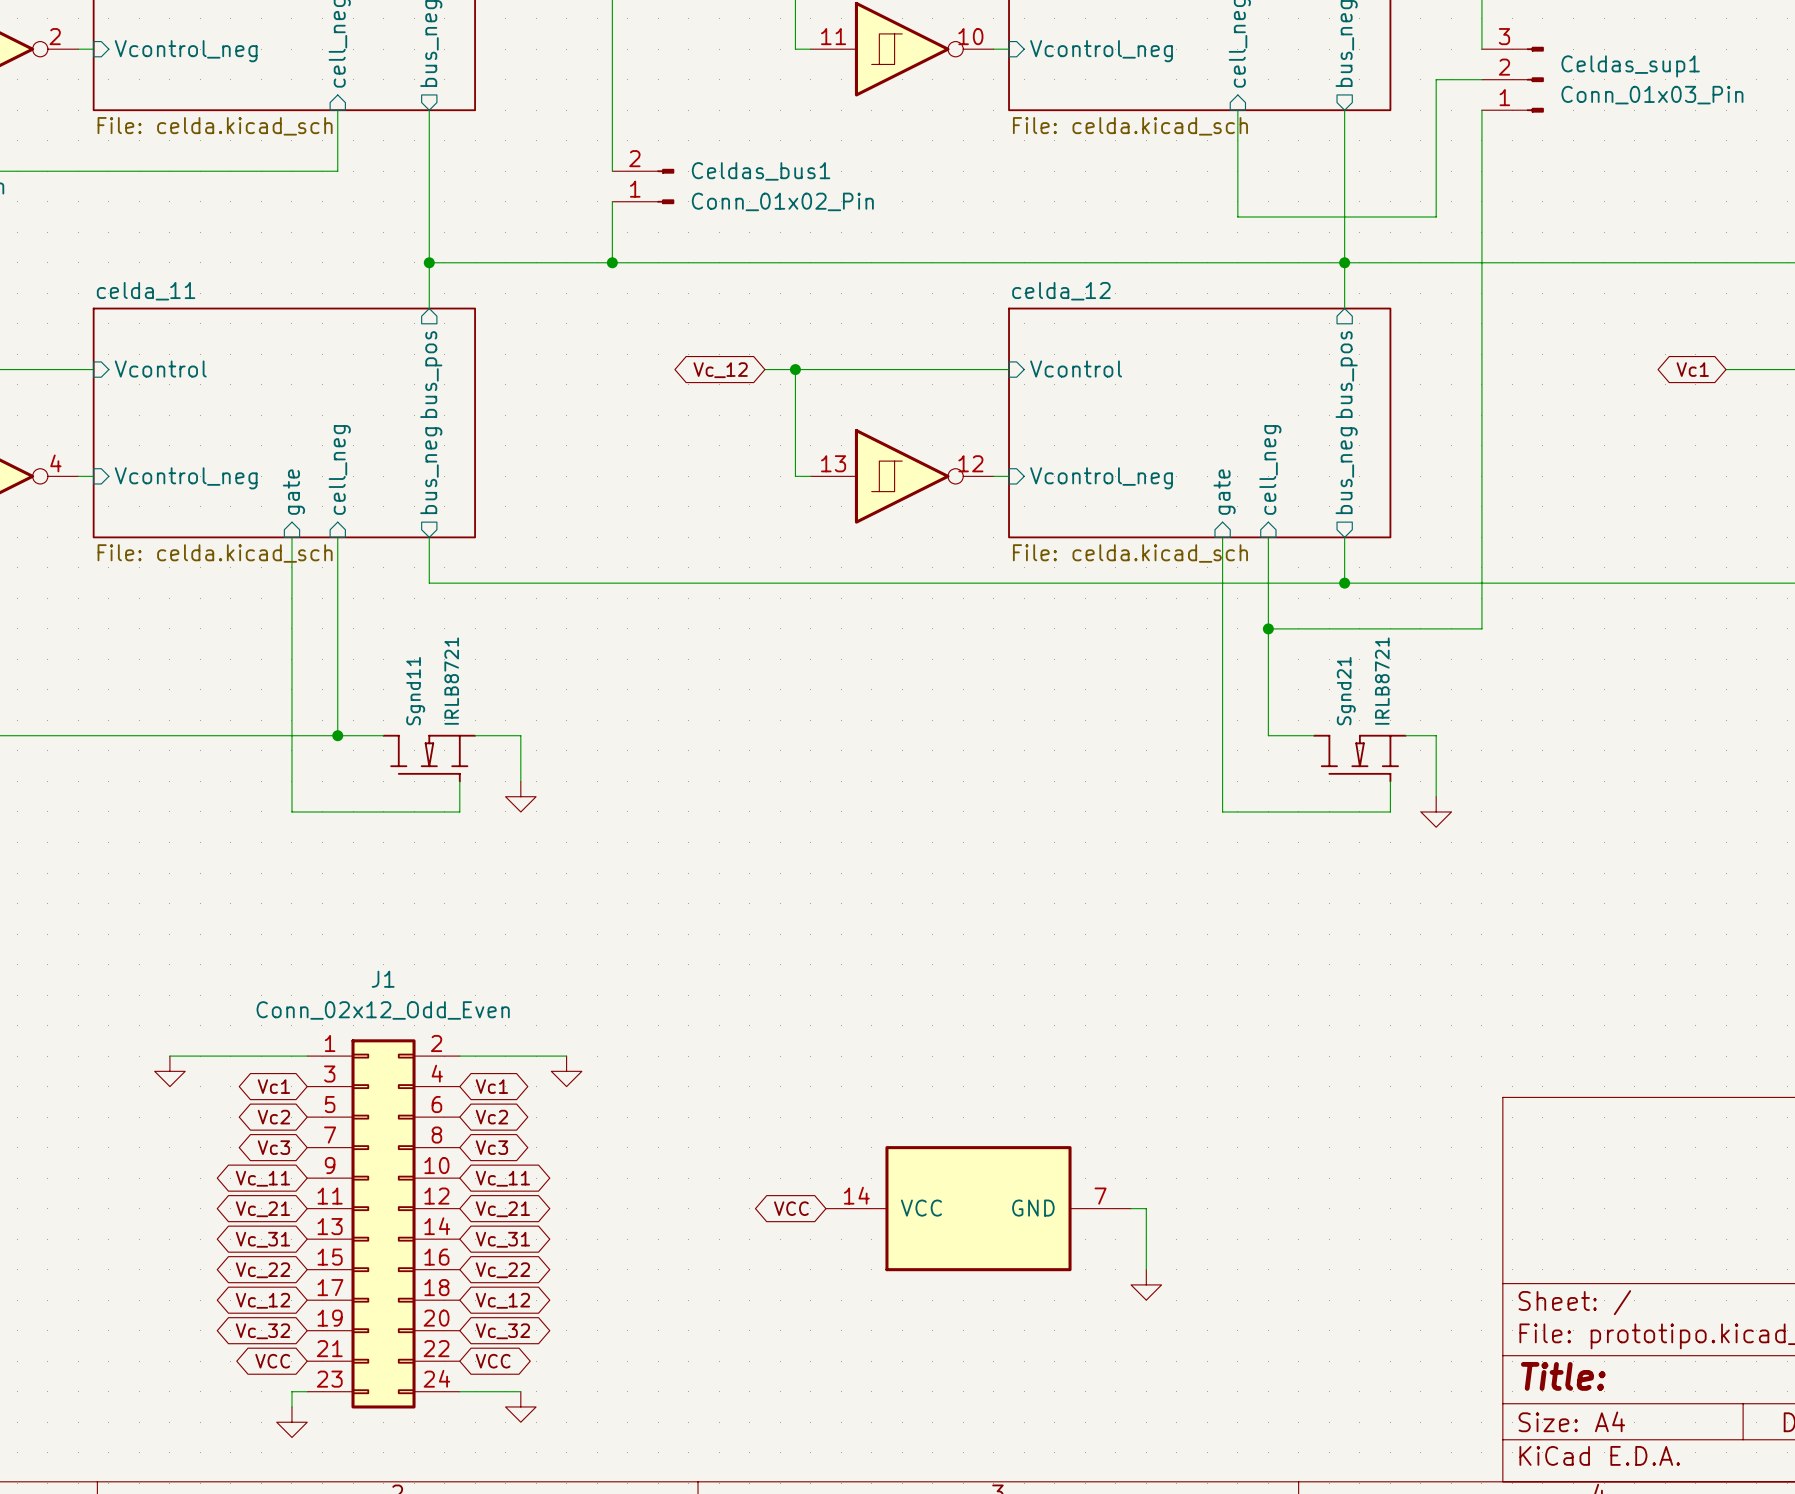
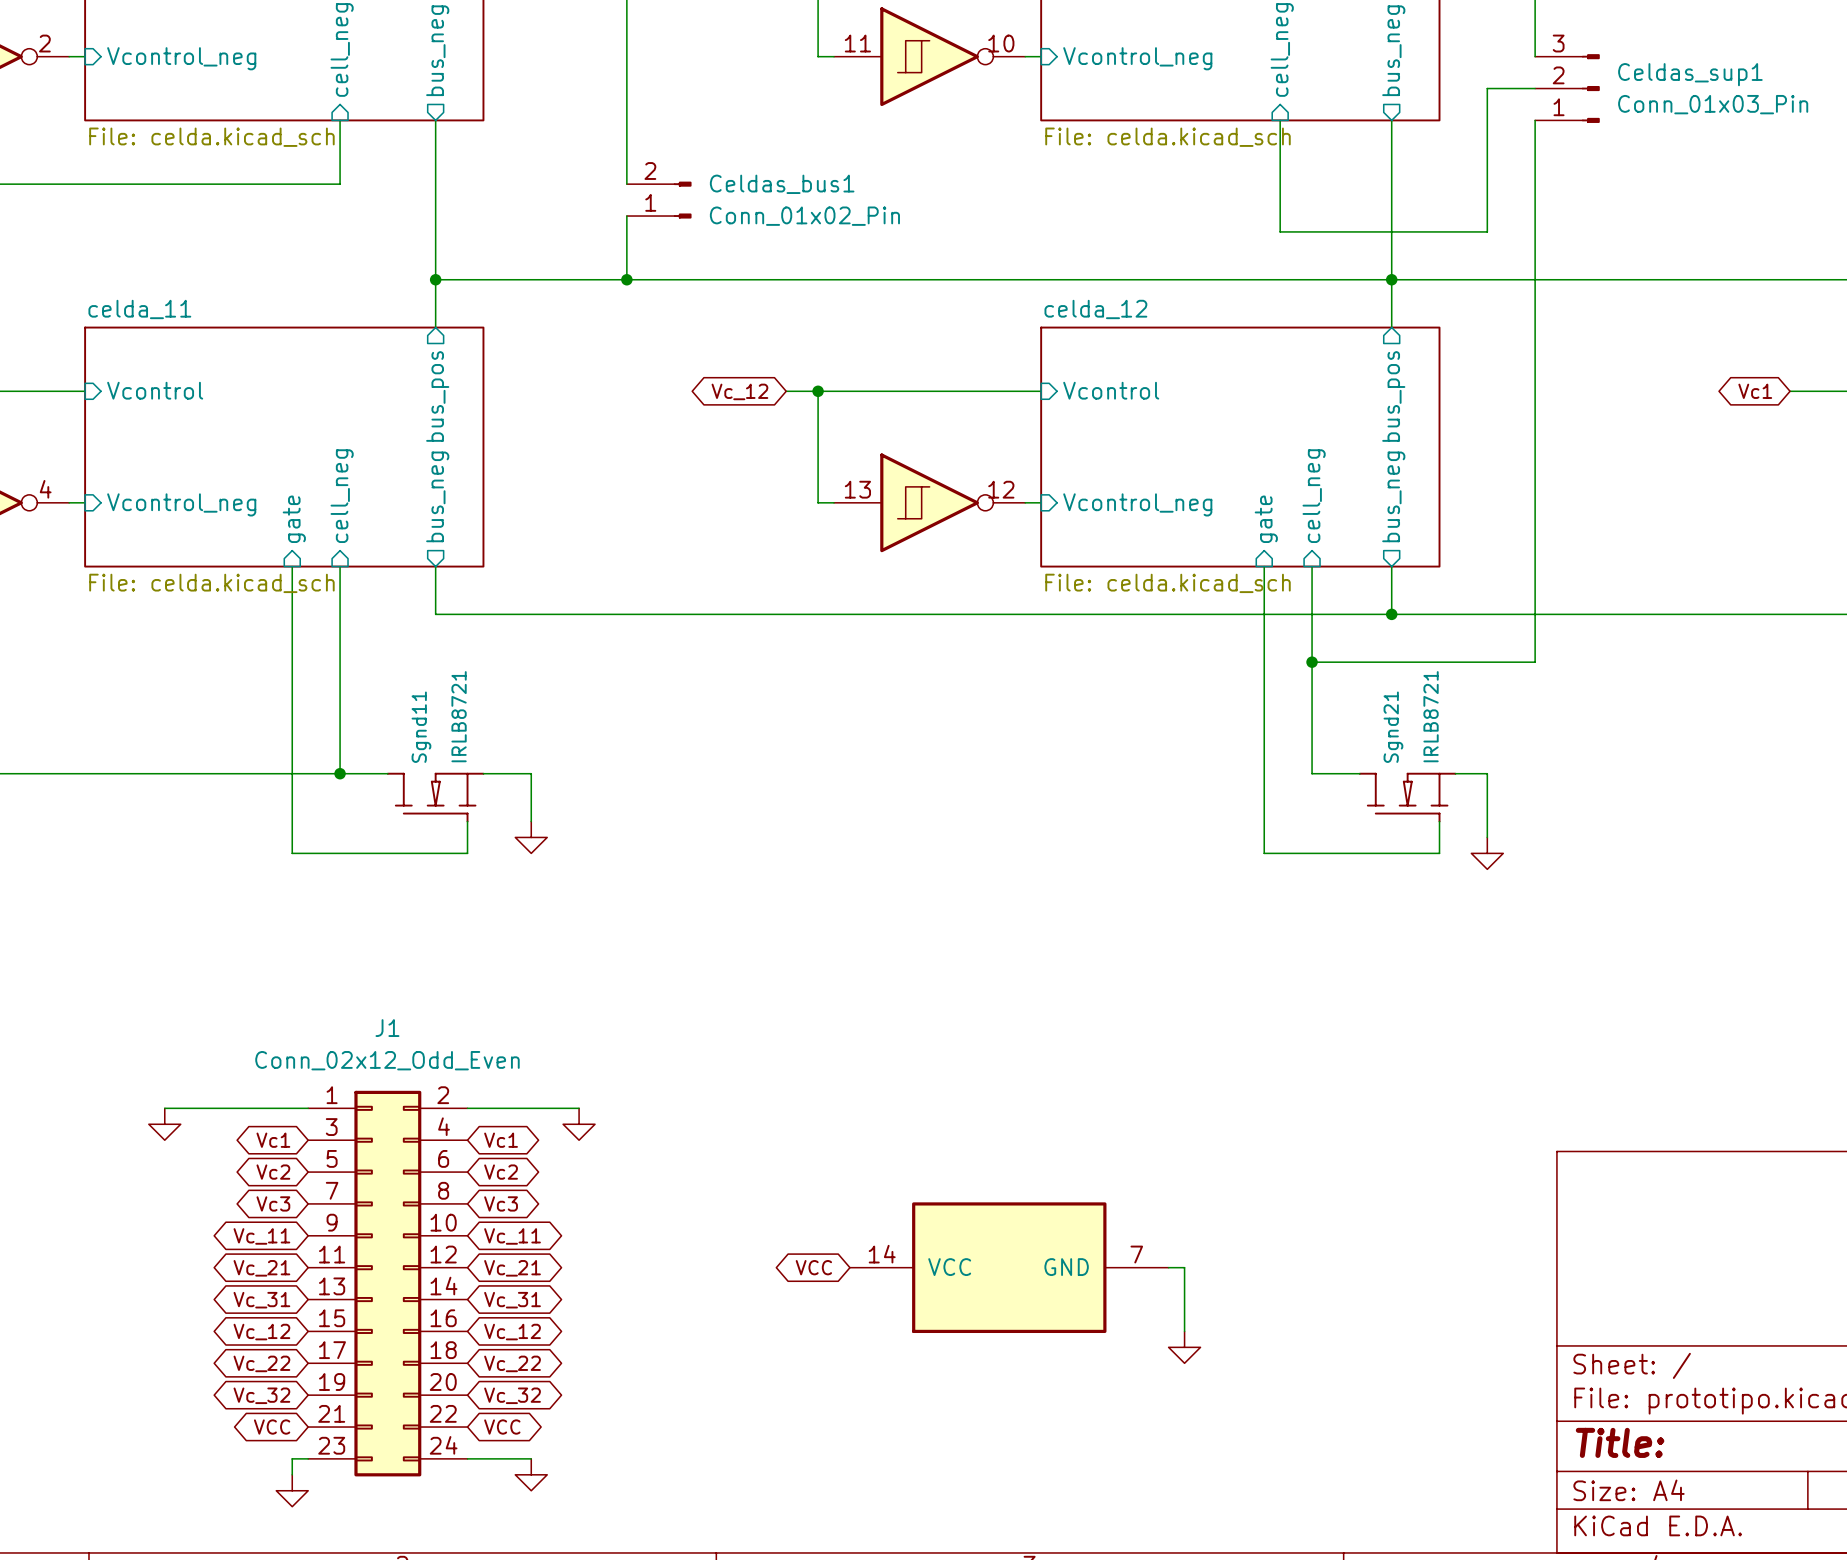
global label: Vc_22 (262, 1270) -> Vc_12 (261, 1332)
global label: Vc_22 (502, 1270) -> Vc_12 (512, 1332)
global label: Vc_12 (262, 1300) -> Vc_22 (261, 1363)
global label: Vc_12 (502, 1300) -> Vc_22 (512, 1363)

